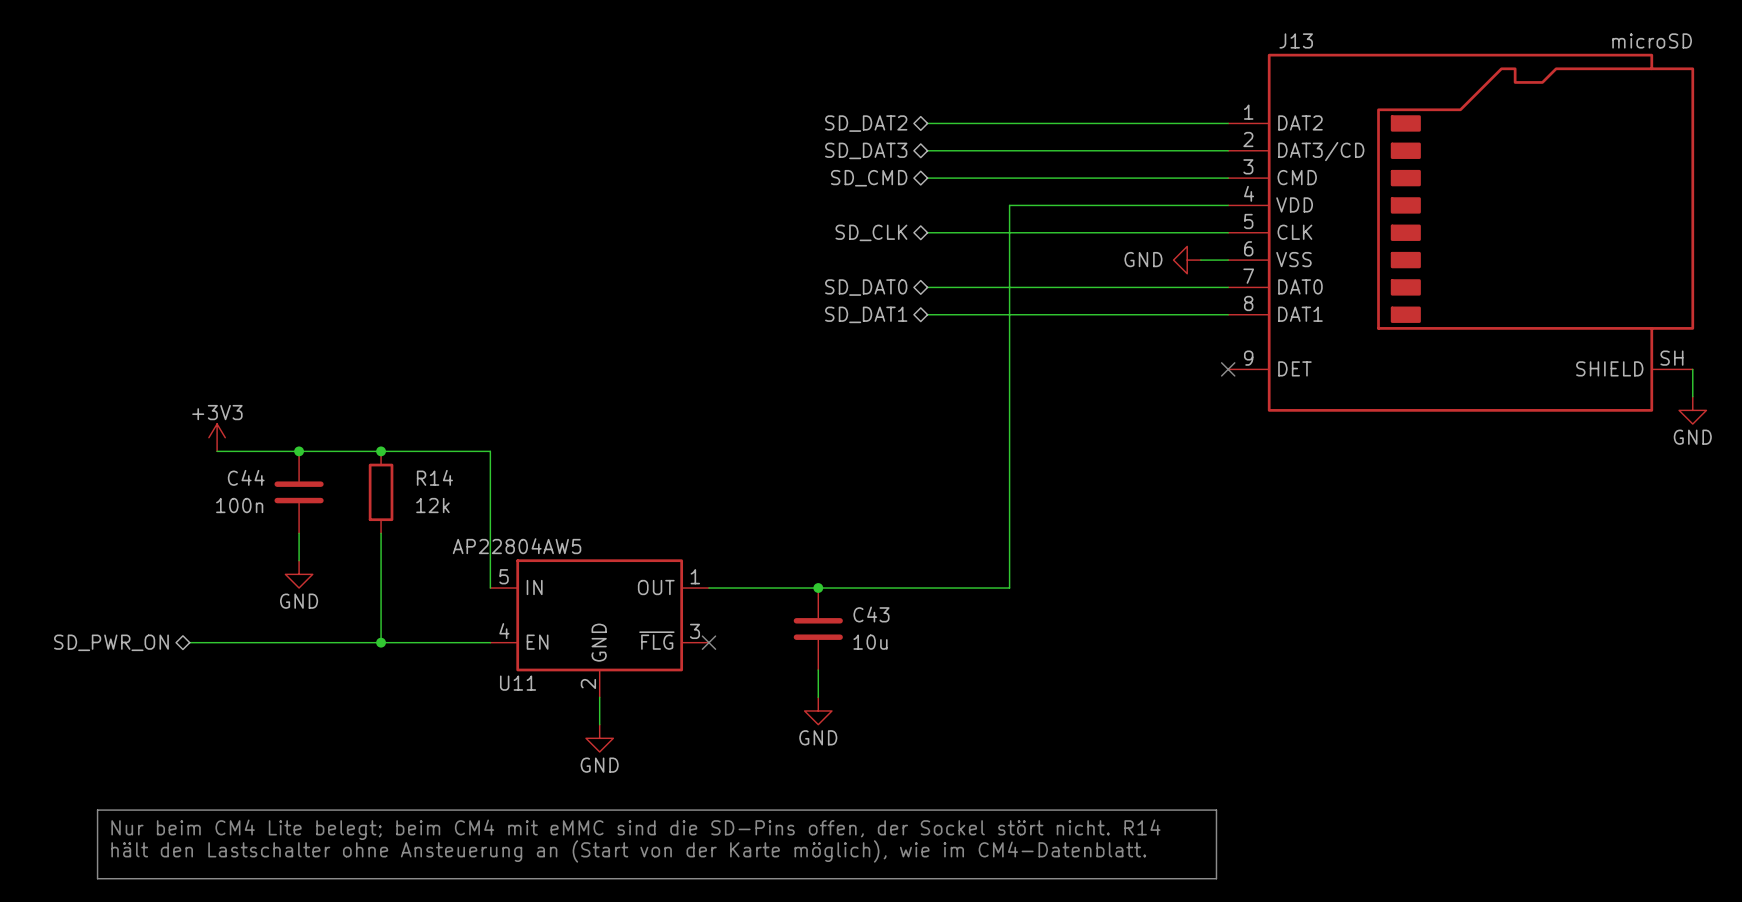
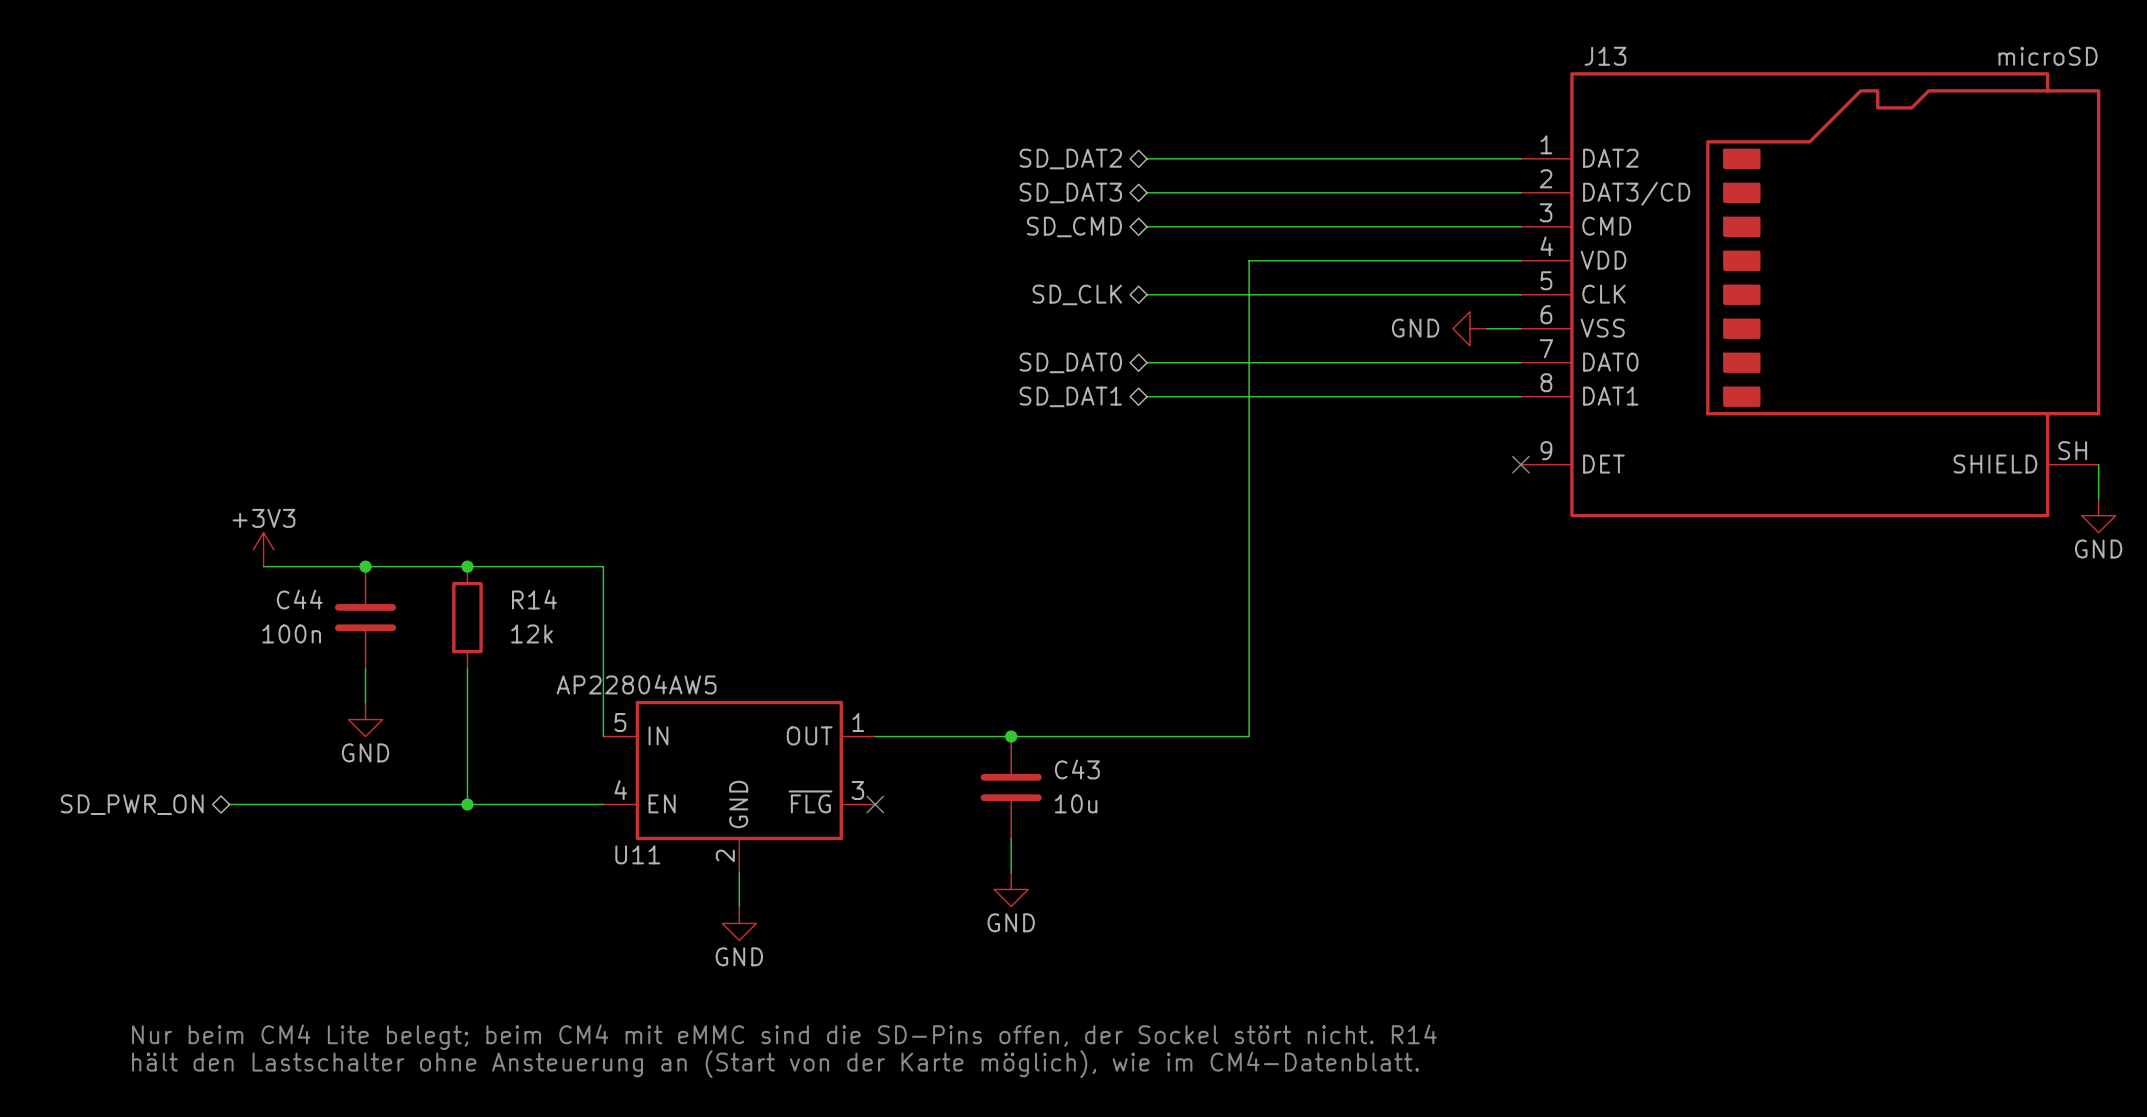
line: (97, 810) (1216, 810) (1216, 878) (97, 878) (97, 810) -> none

